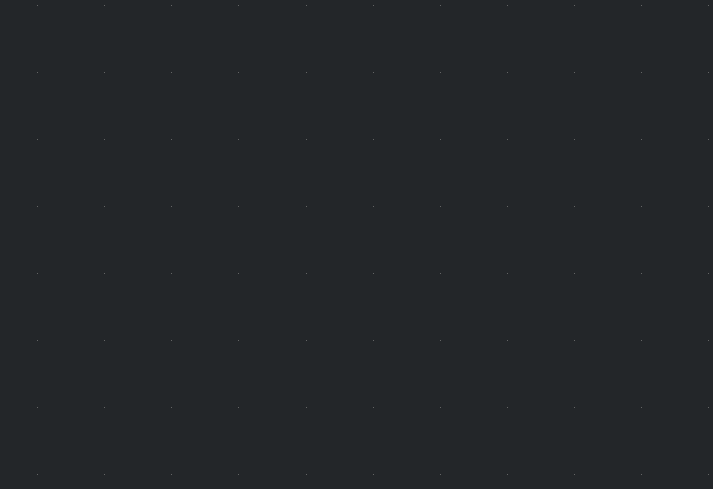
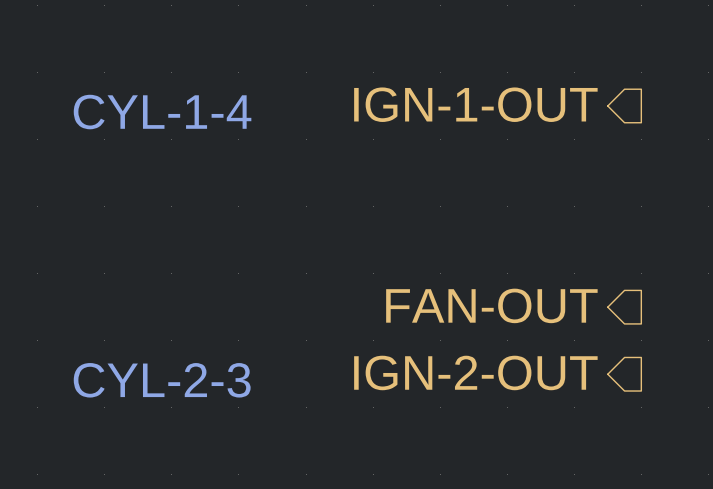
hierarchical label: none -> IGN-1-OUT (475, 104)
text: none -> CYL-1-4 (162, 112)
hierarchical label: none -> FAN-OUT (491, 305)
hierarchical label: none -> IGN-2-OUT (475, 372)
text: none -> CYL-2-3 (162, 380)

